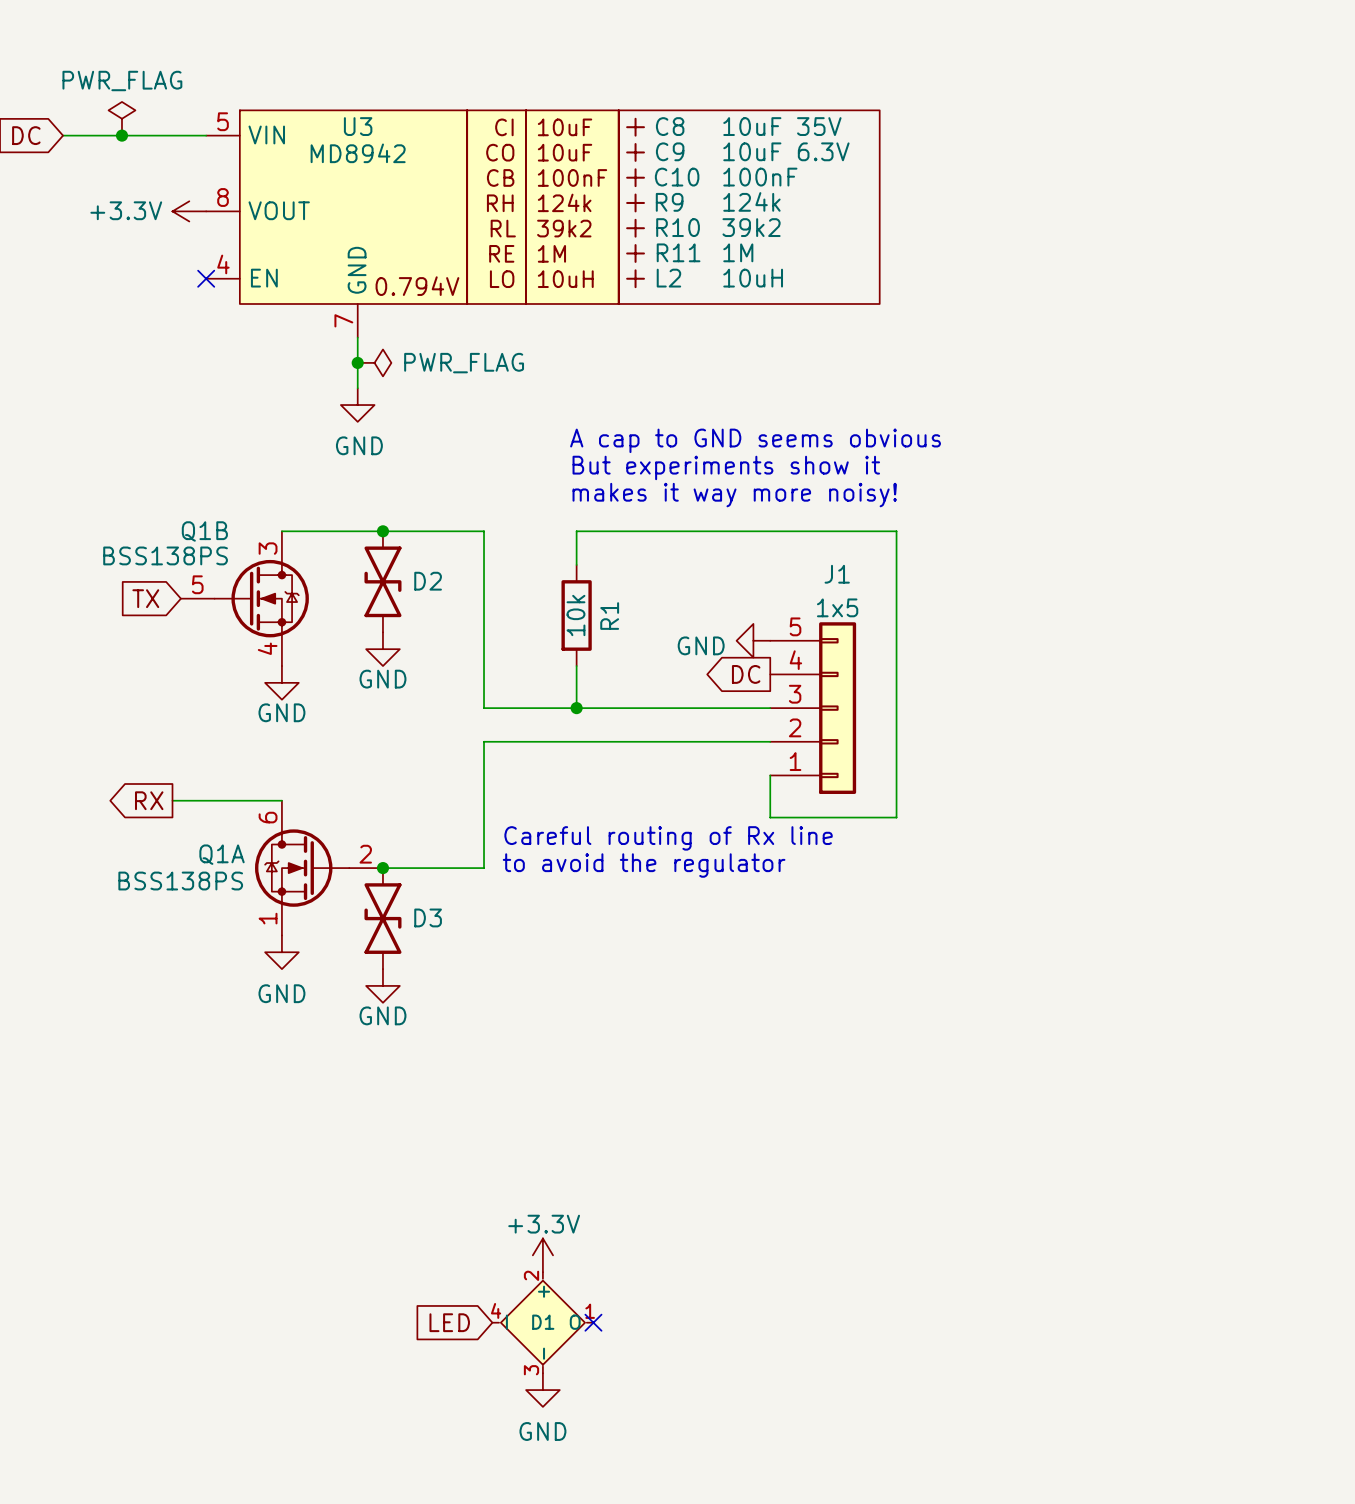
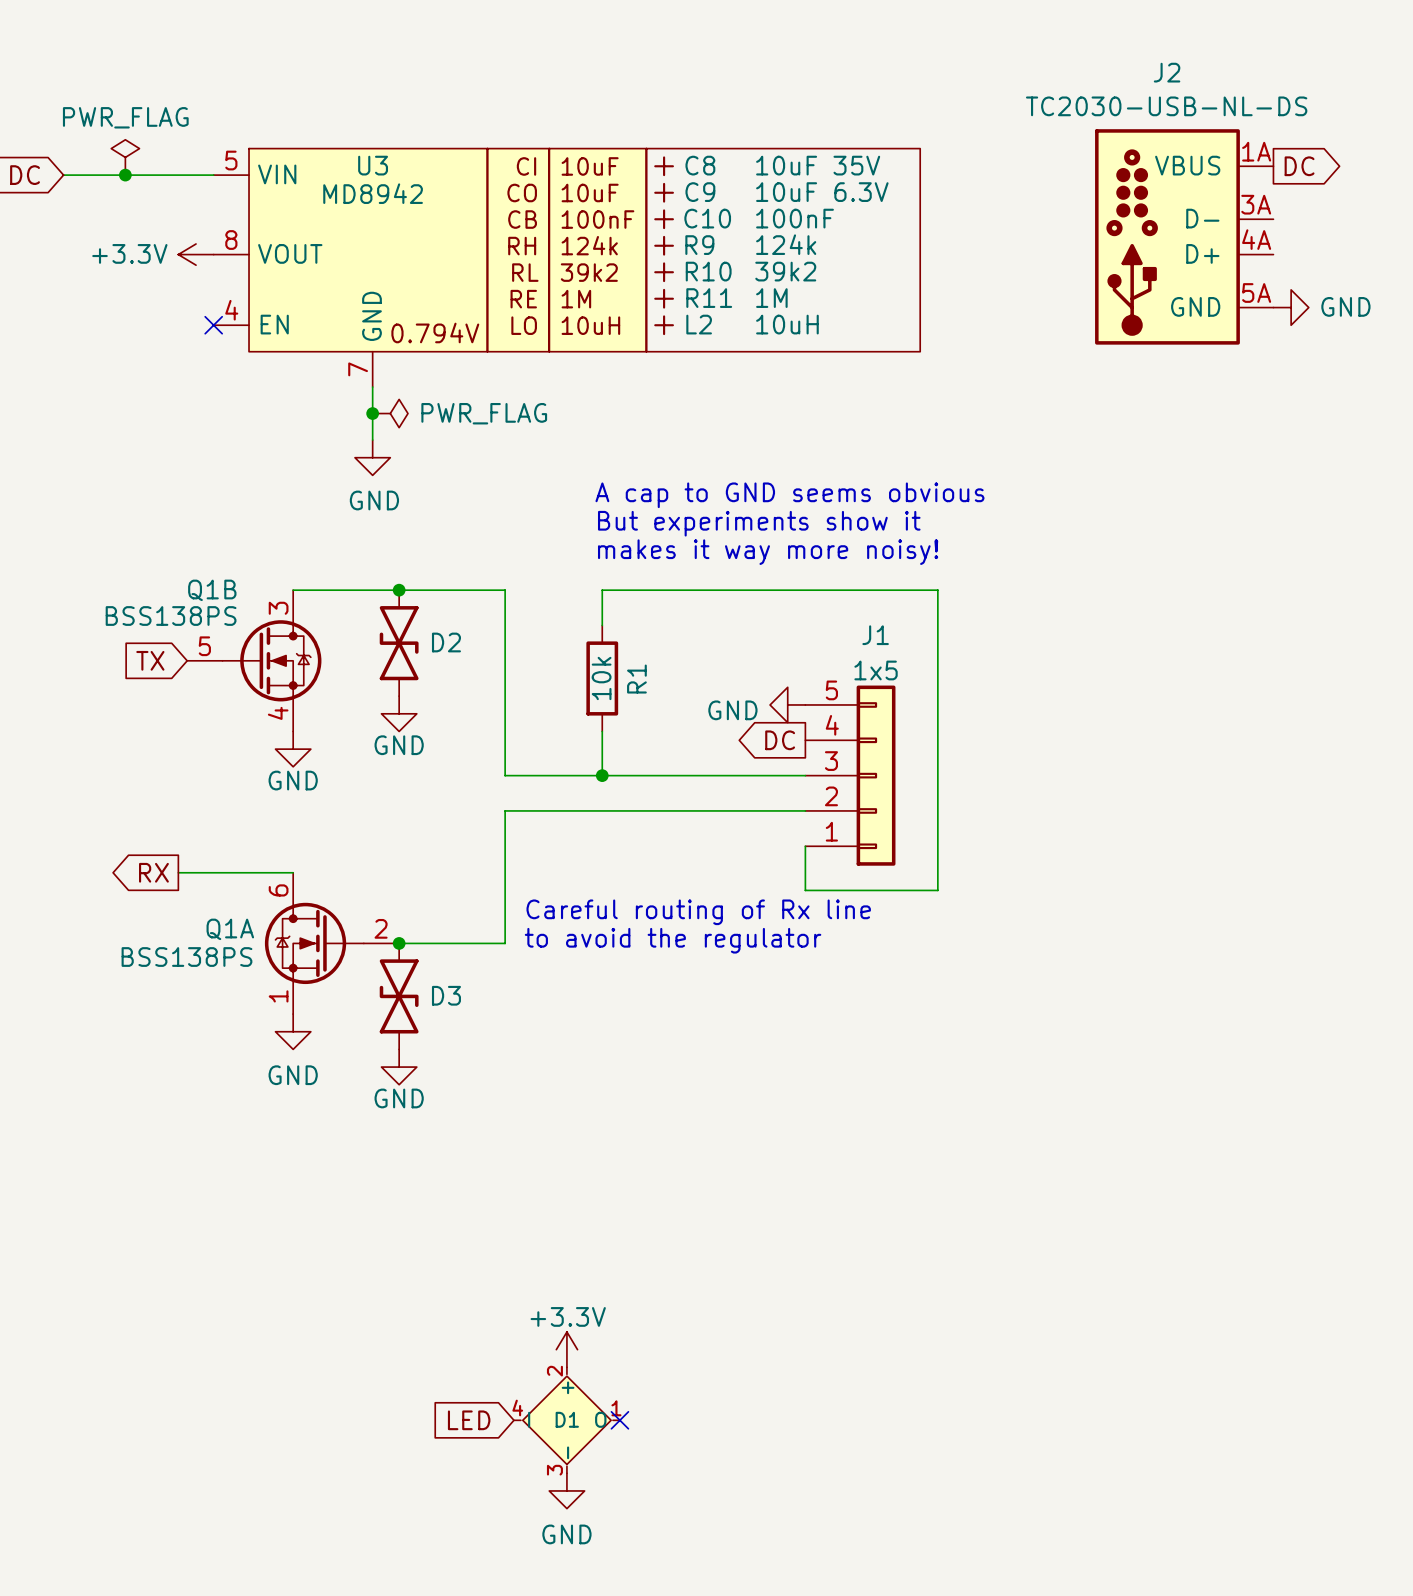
global label: none -> DC (1299, 166)
J2: none -> TC2030-USB-NL-DS (1184, 236)
power symbol: none -> GND (1291, 307)

